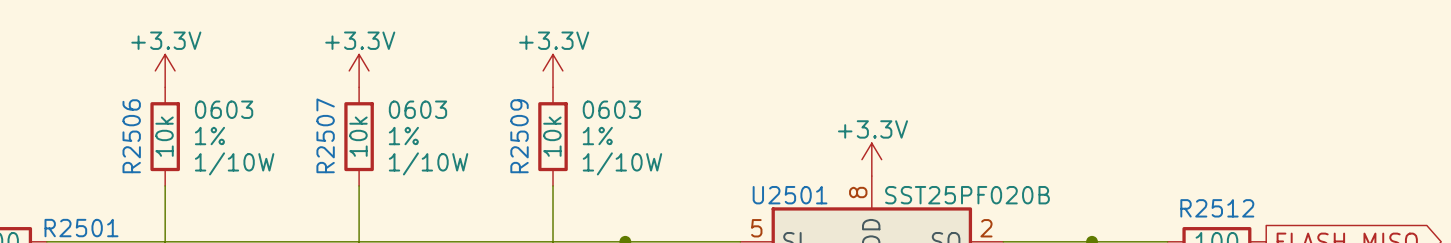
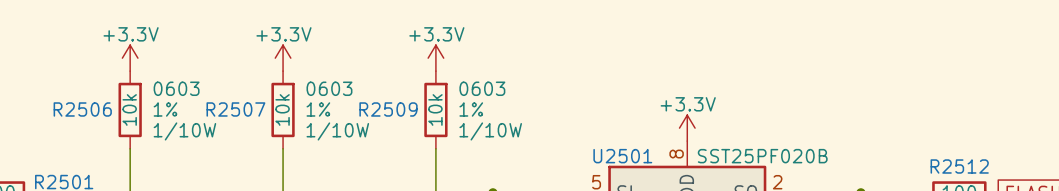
R2507 name rotation: 0° (325, 135) -> 90° clockwise (235, 109)
R2506 name rotation: 0° (131, 136) -> 90° clockwise (82, 109)
R2509 name rotation: 0° (519, 136) -> 90° clockwise (388, 109)

